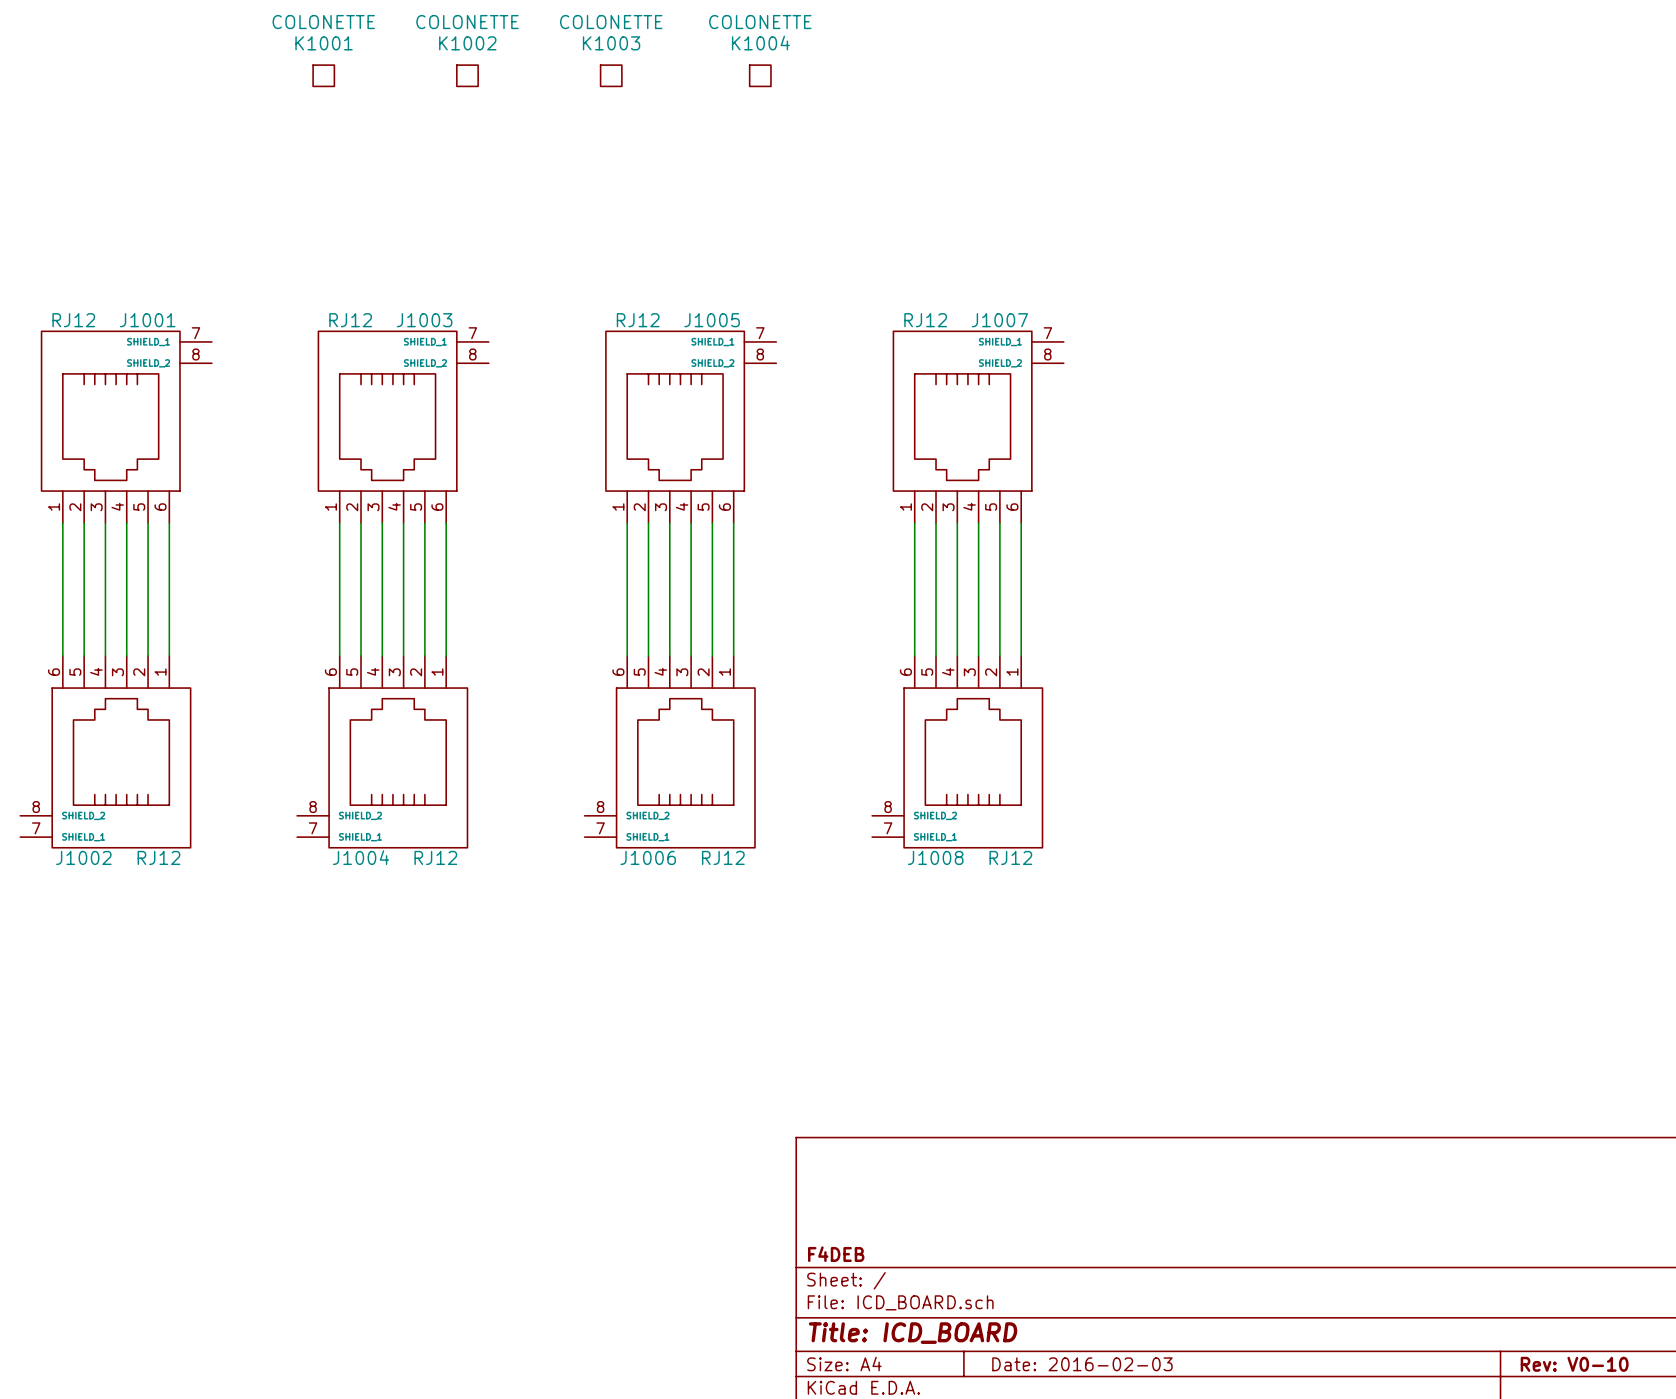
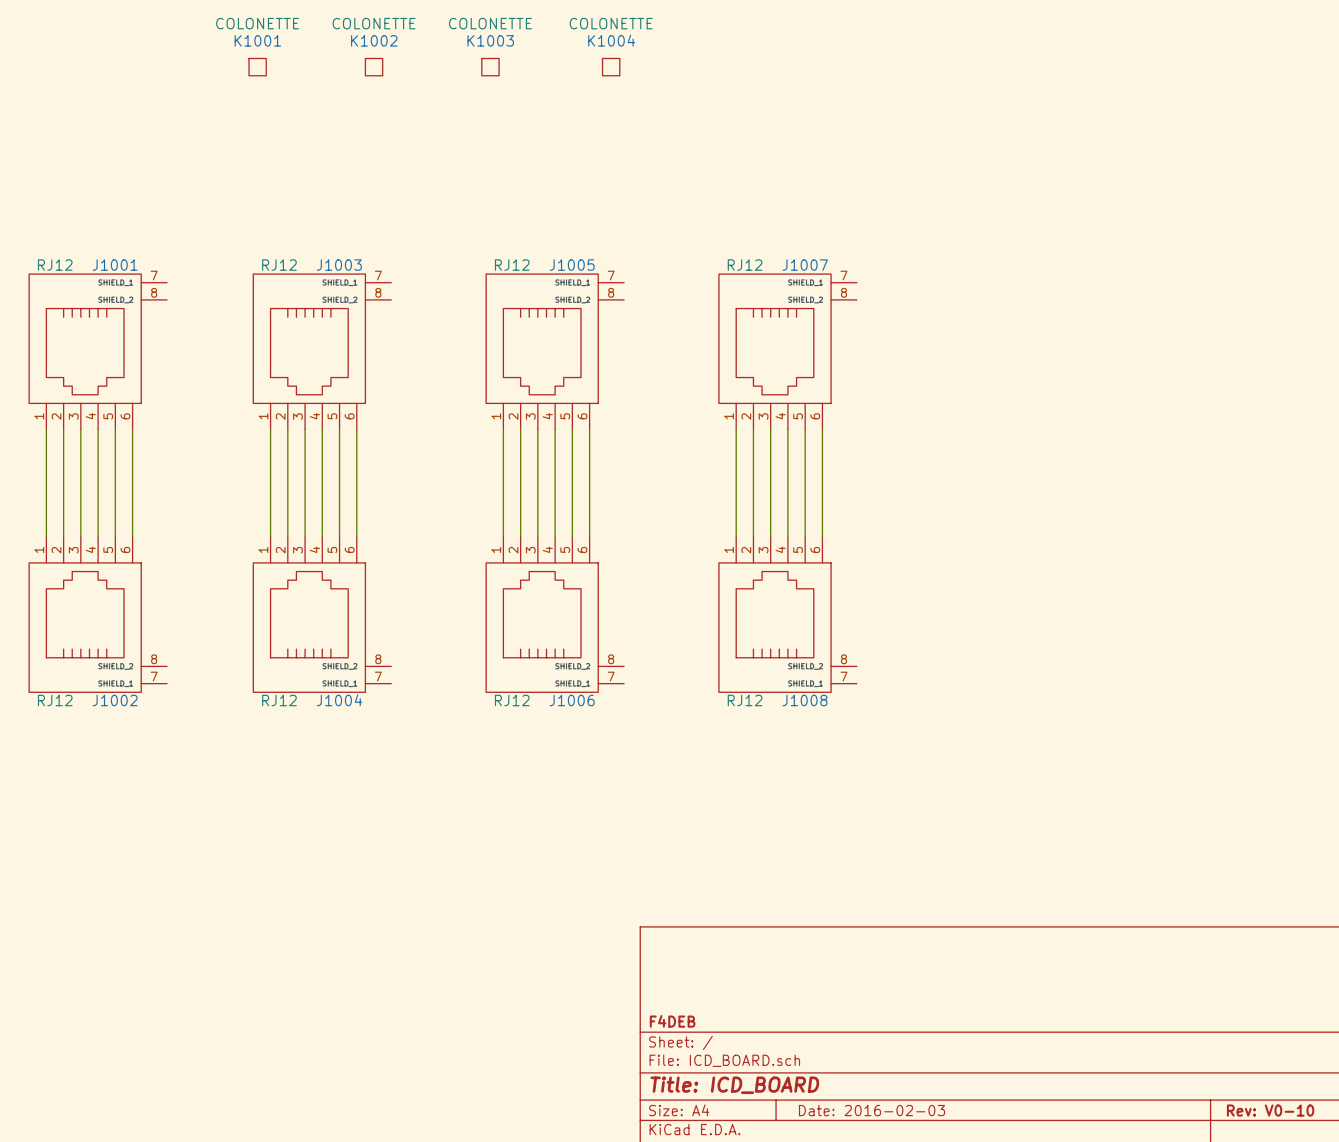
J1002 flip: as is (121, 767) -> left-right (85, 627)
J1004 flip: as is (398, 767) -> left-right (309, 627)
J1006 flip: as is (685, 767) -> left-right (542, 627)
J1008 flip: as is (973, 767) -> left-right (775, 627)

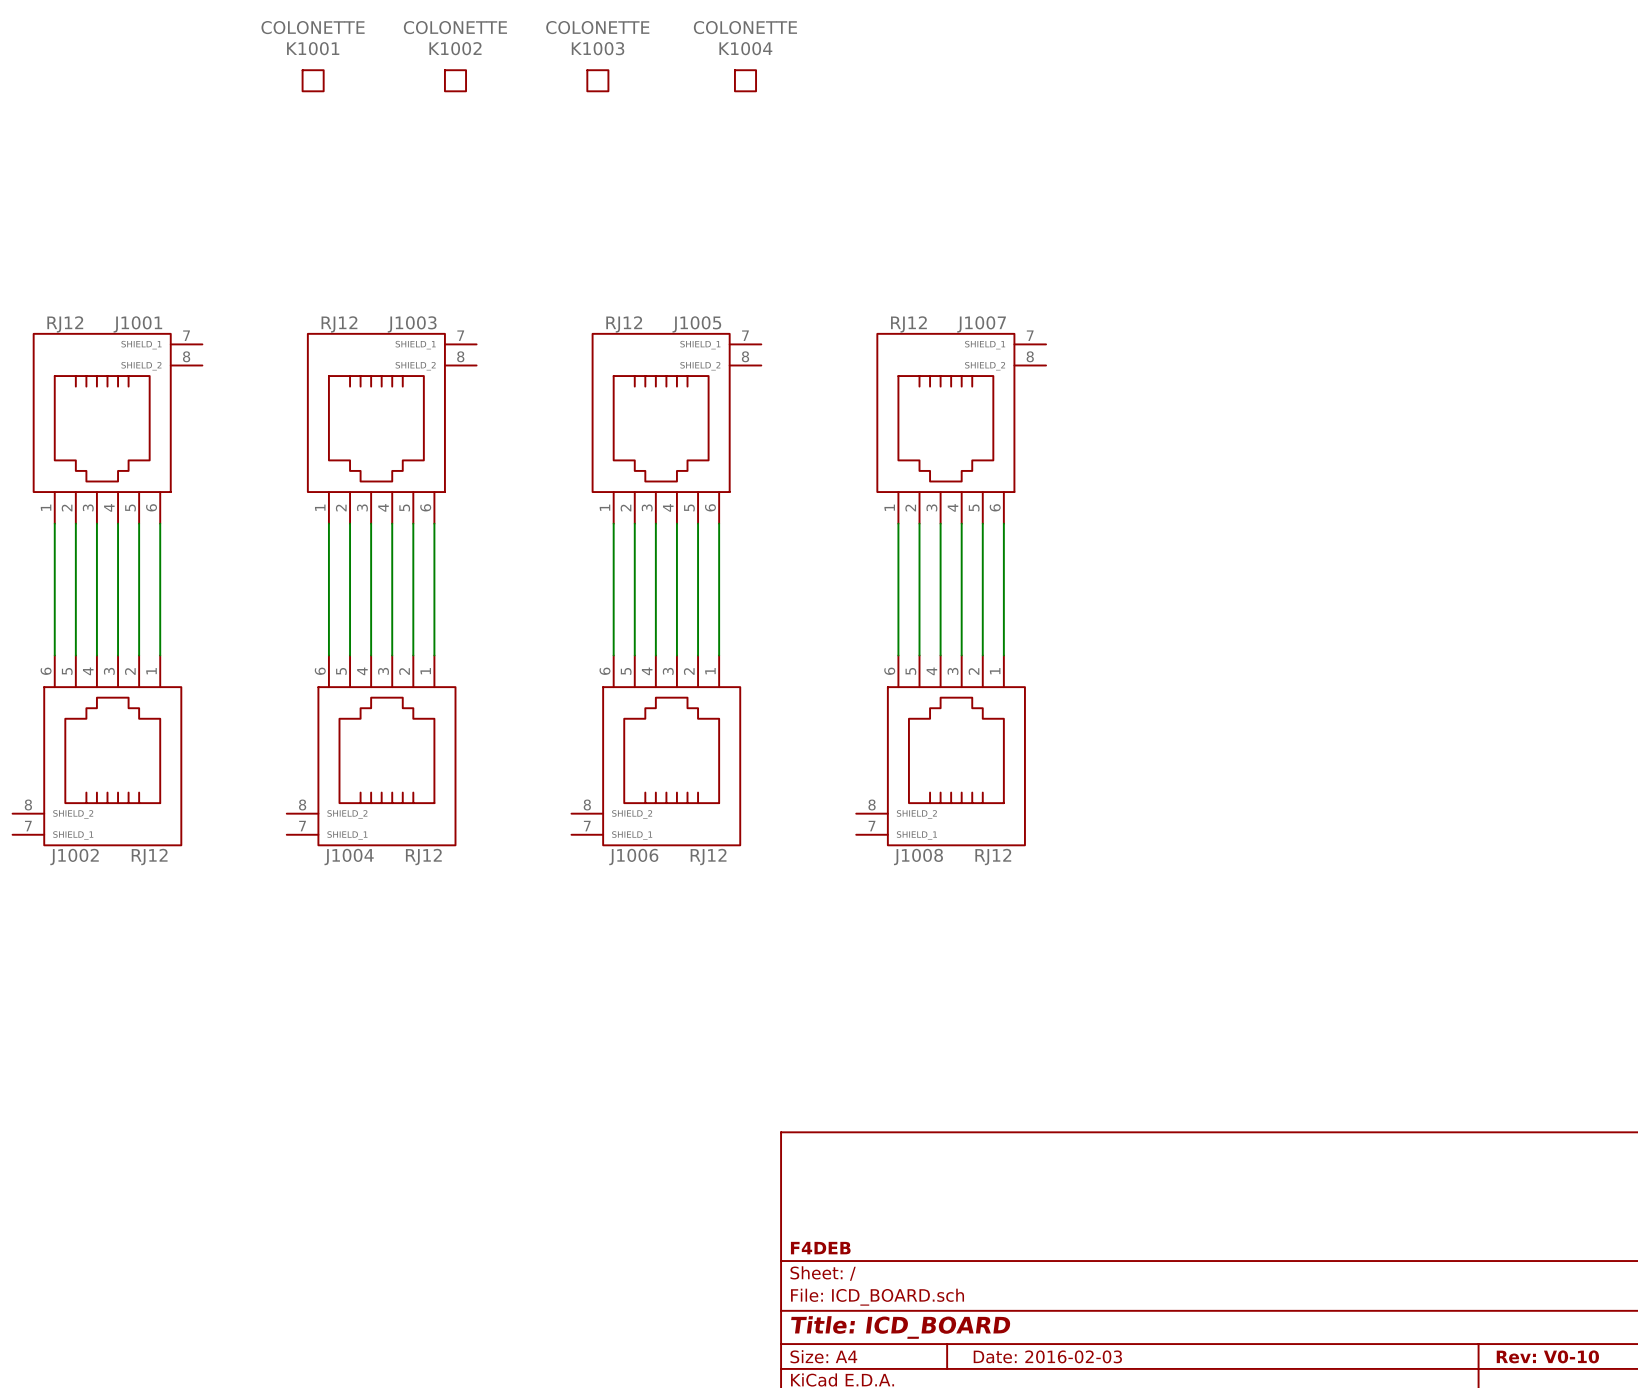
J1002 flip: as is (85, 627) -> left-right (112, 766)
J1004 flip: as is (309, 627) -> left-right (386, 766)
J1006 flip: as is (542, 627) -> left-right (671, 766)
J1008 flip: as is (775, 627) -> left-right (956, 766)

